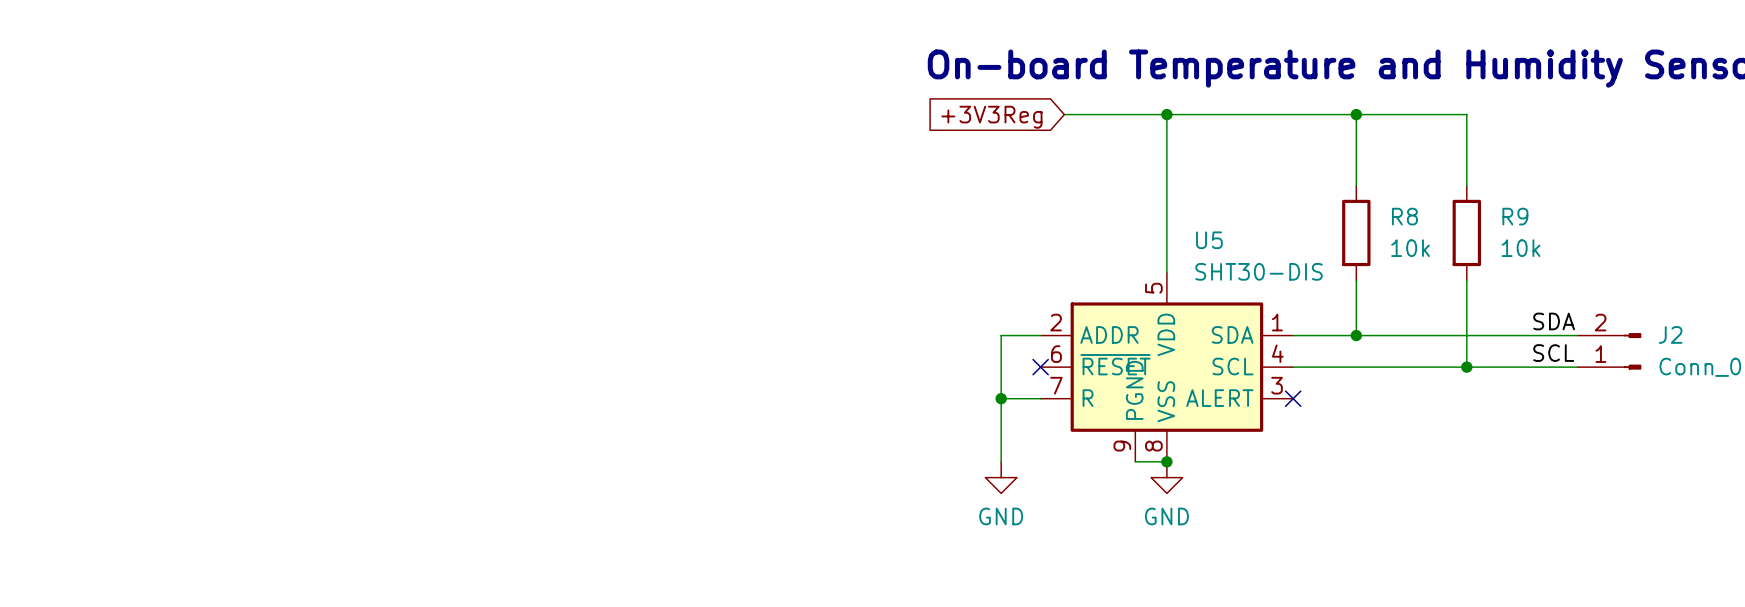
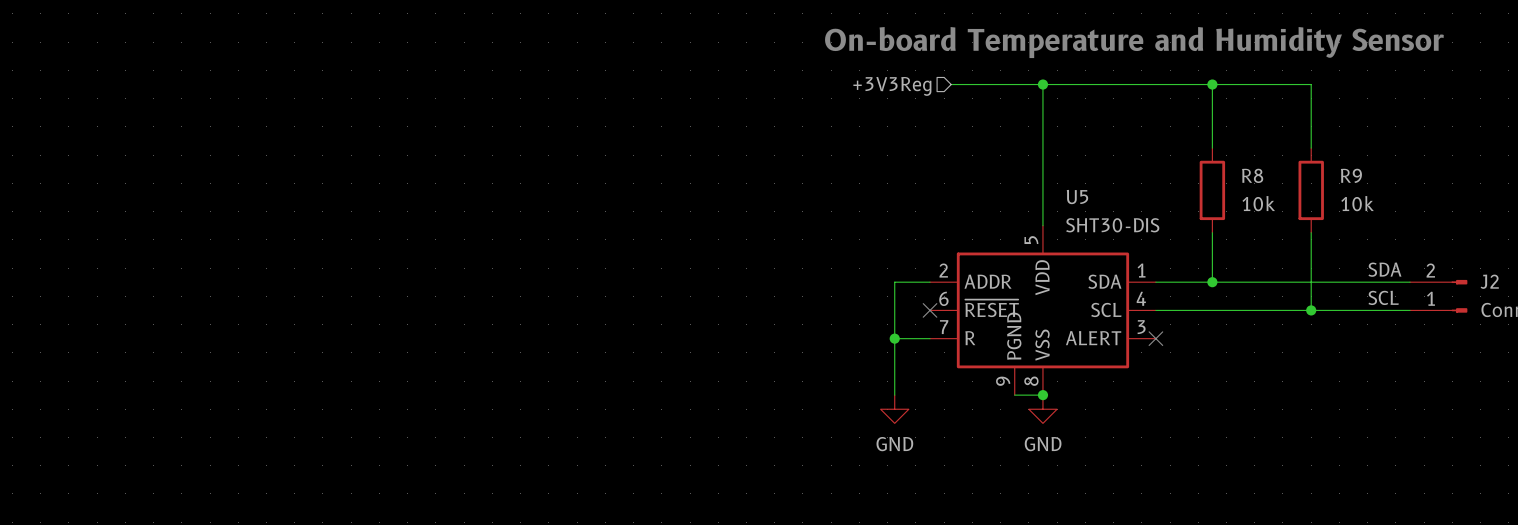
hierarchical label: none -> +3V3Reg (892, 86)
global label: +3V3Reg (991, 117) -> none

